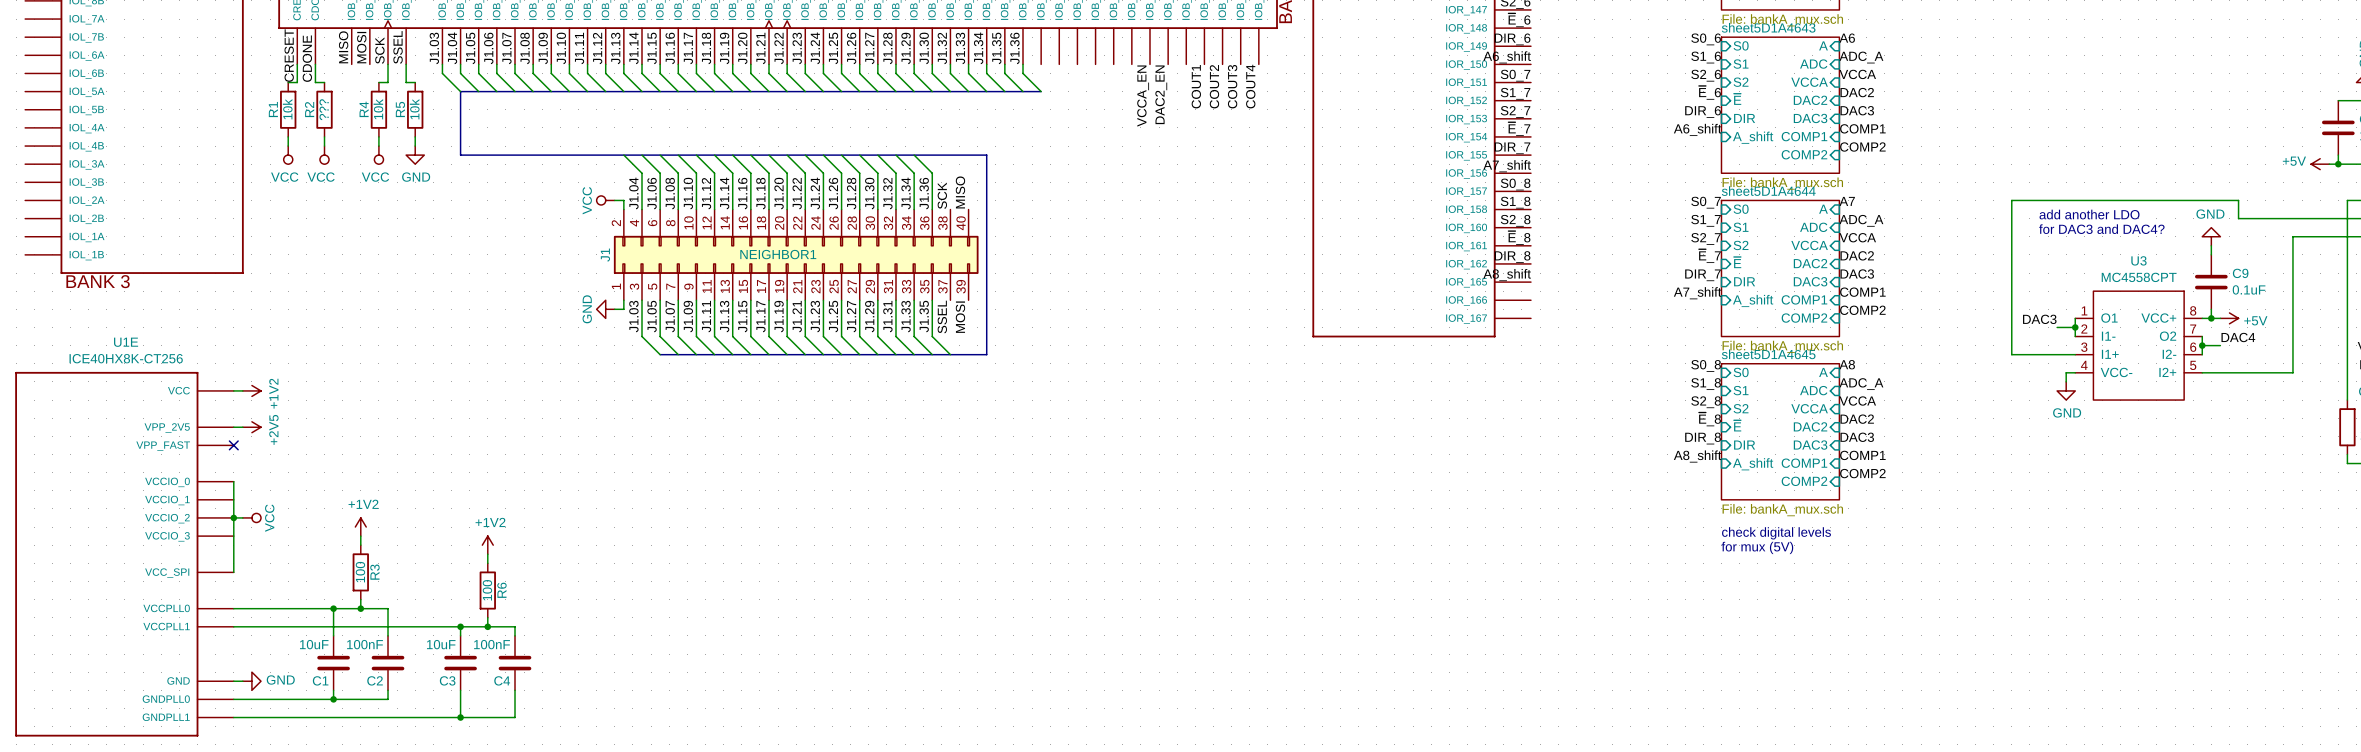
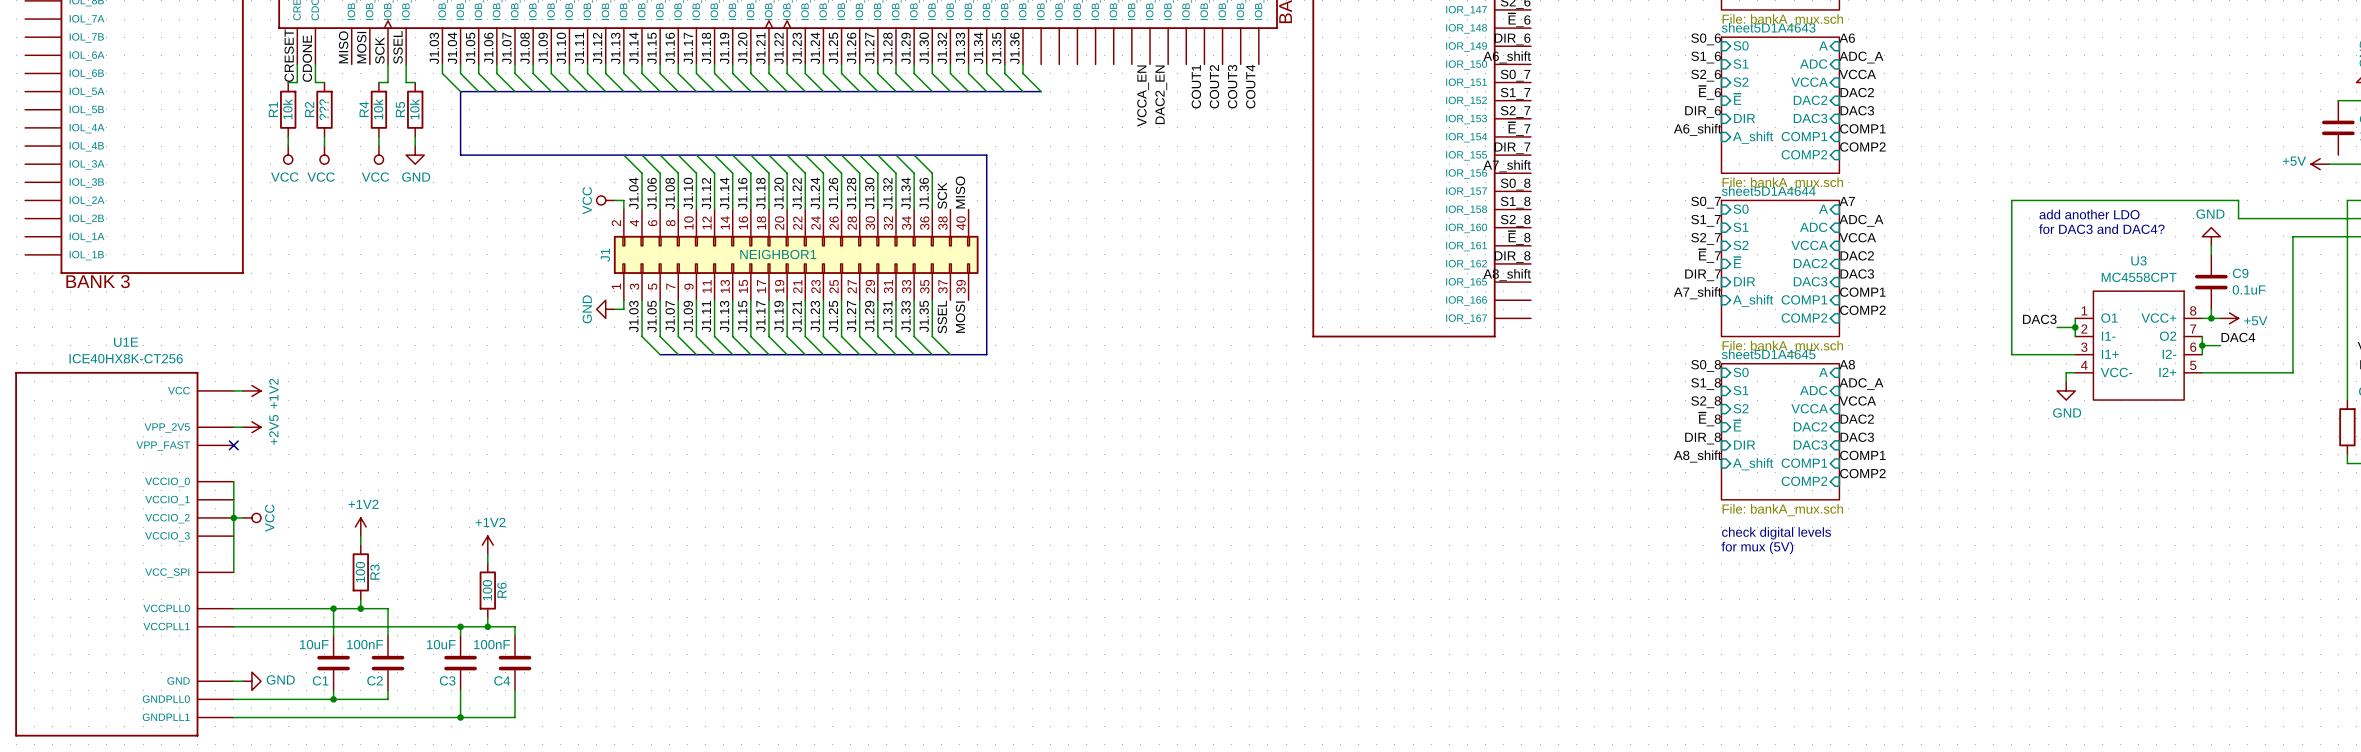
wire: (2338, 155) (2338, 164) -> none
junction: (2338, 164) -> none

